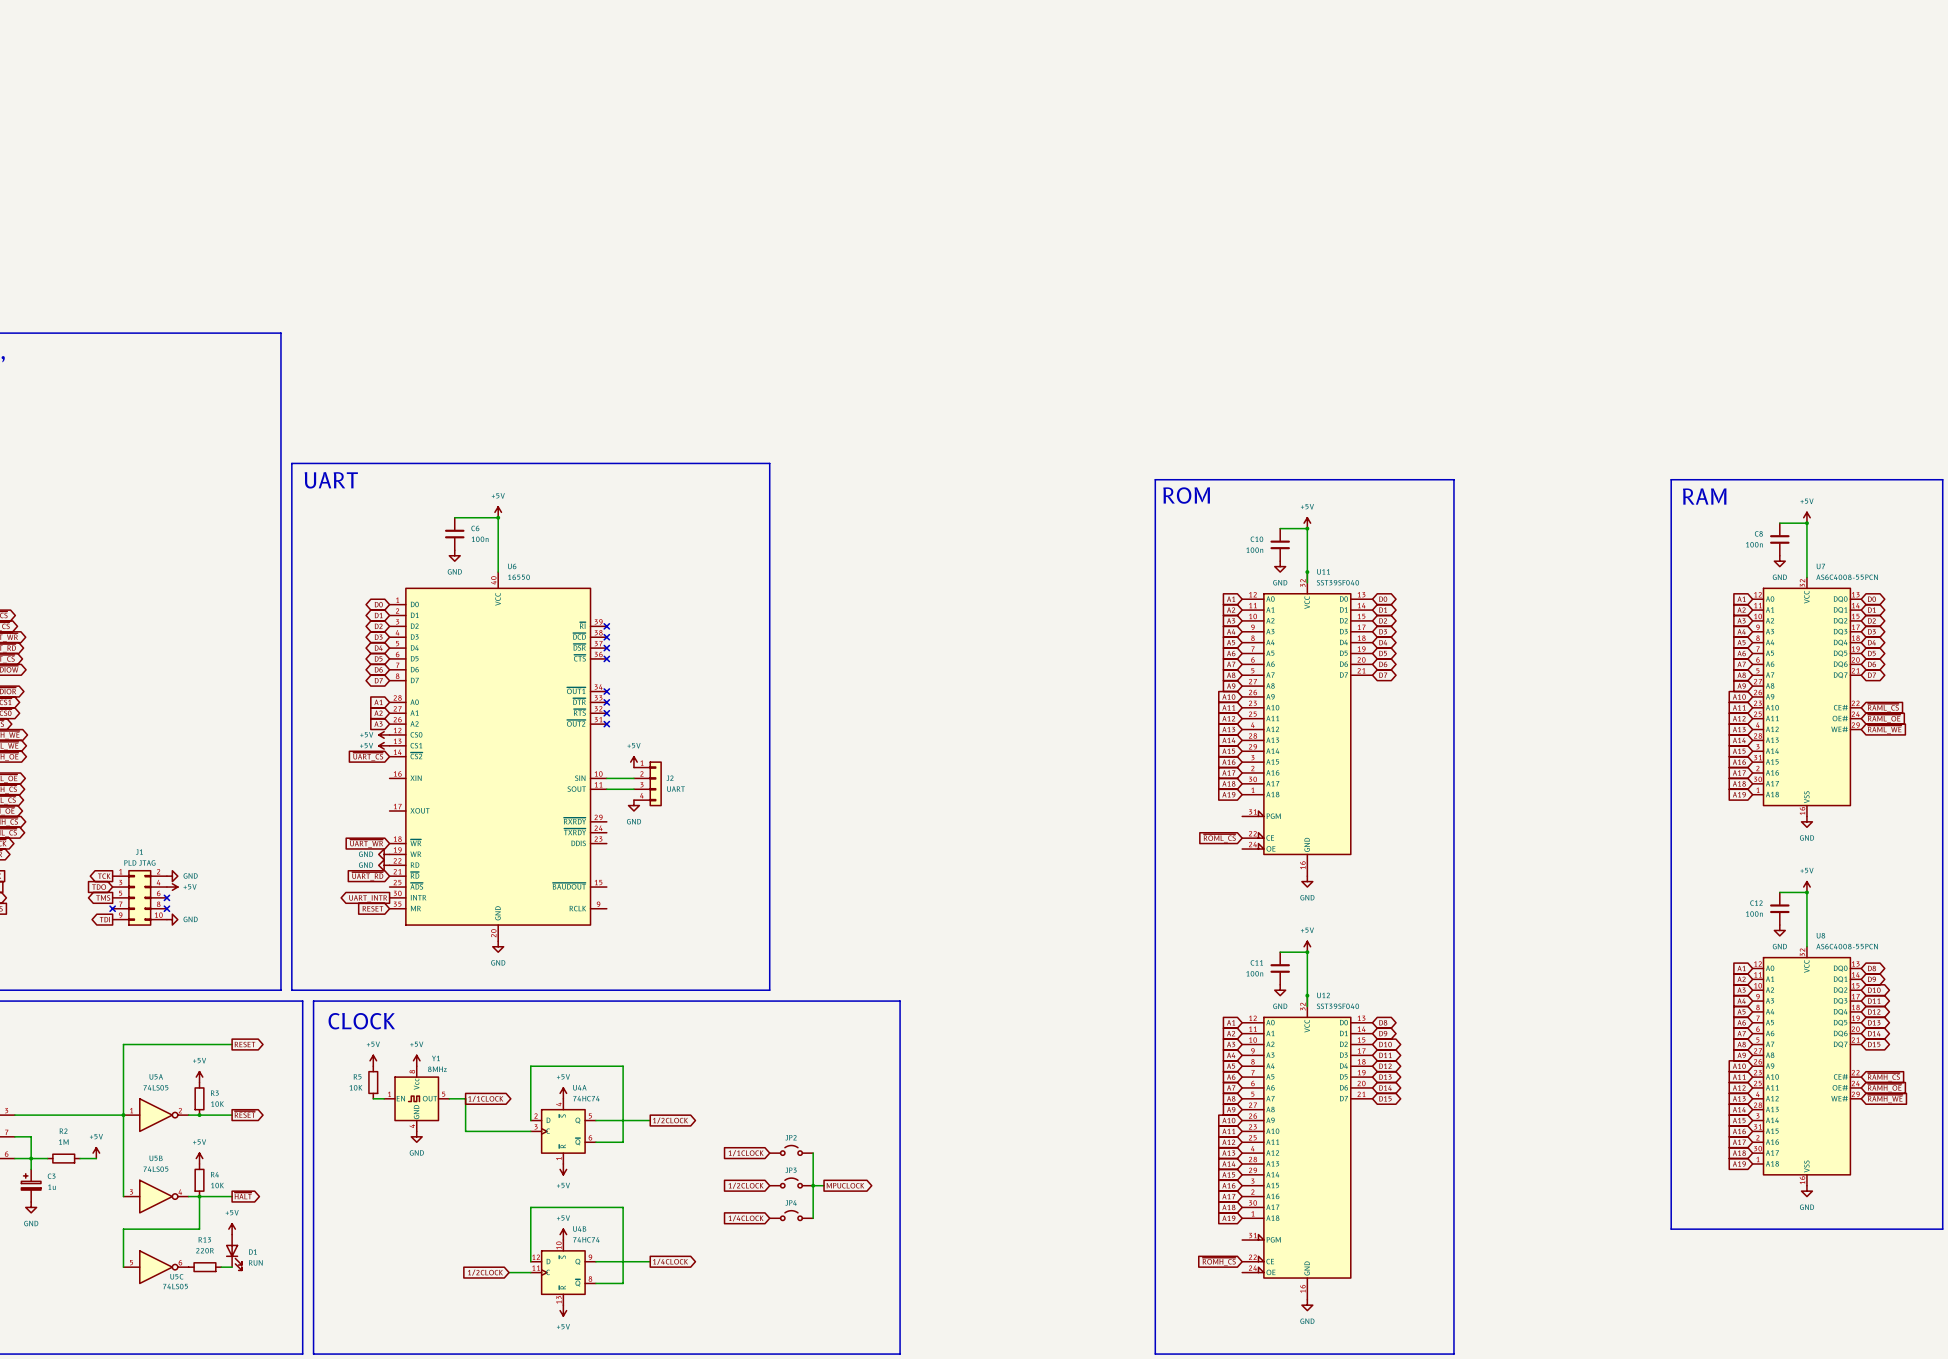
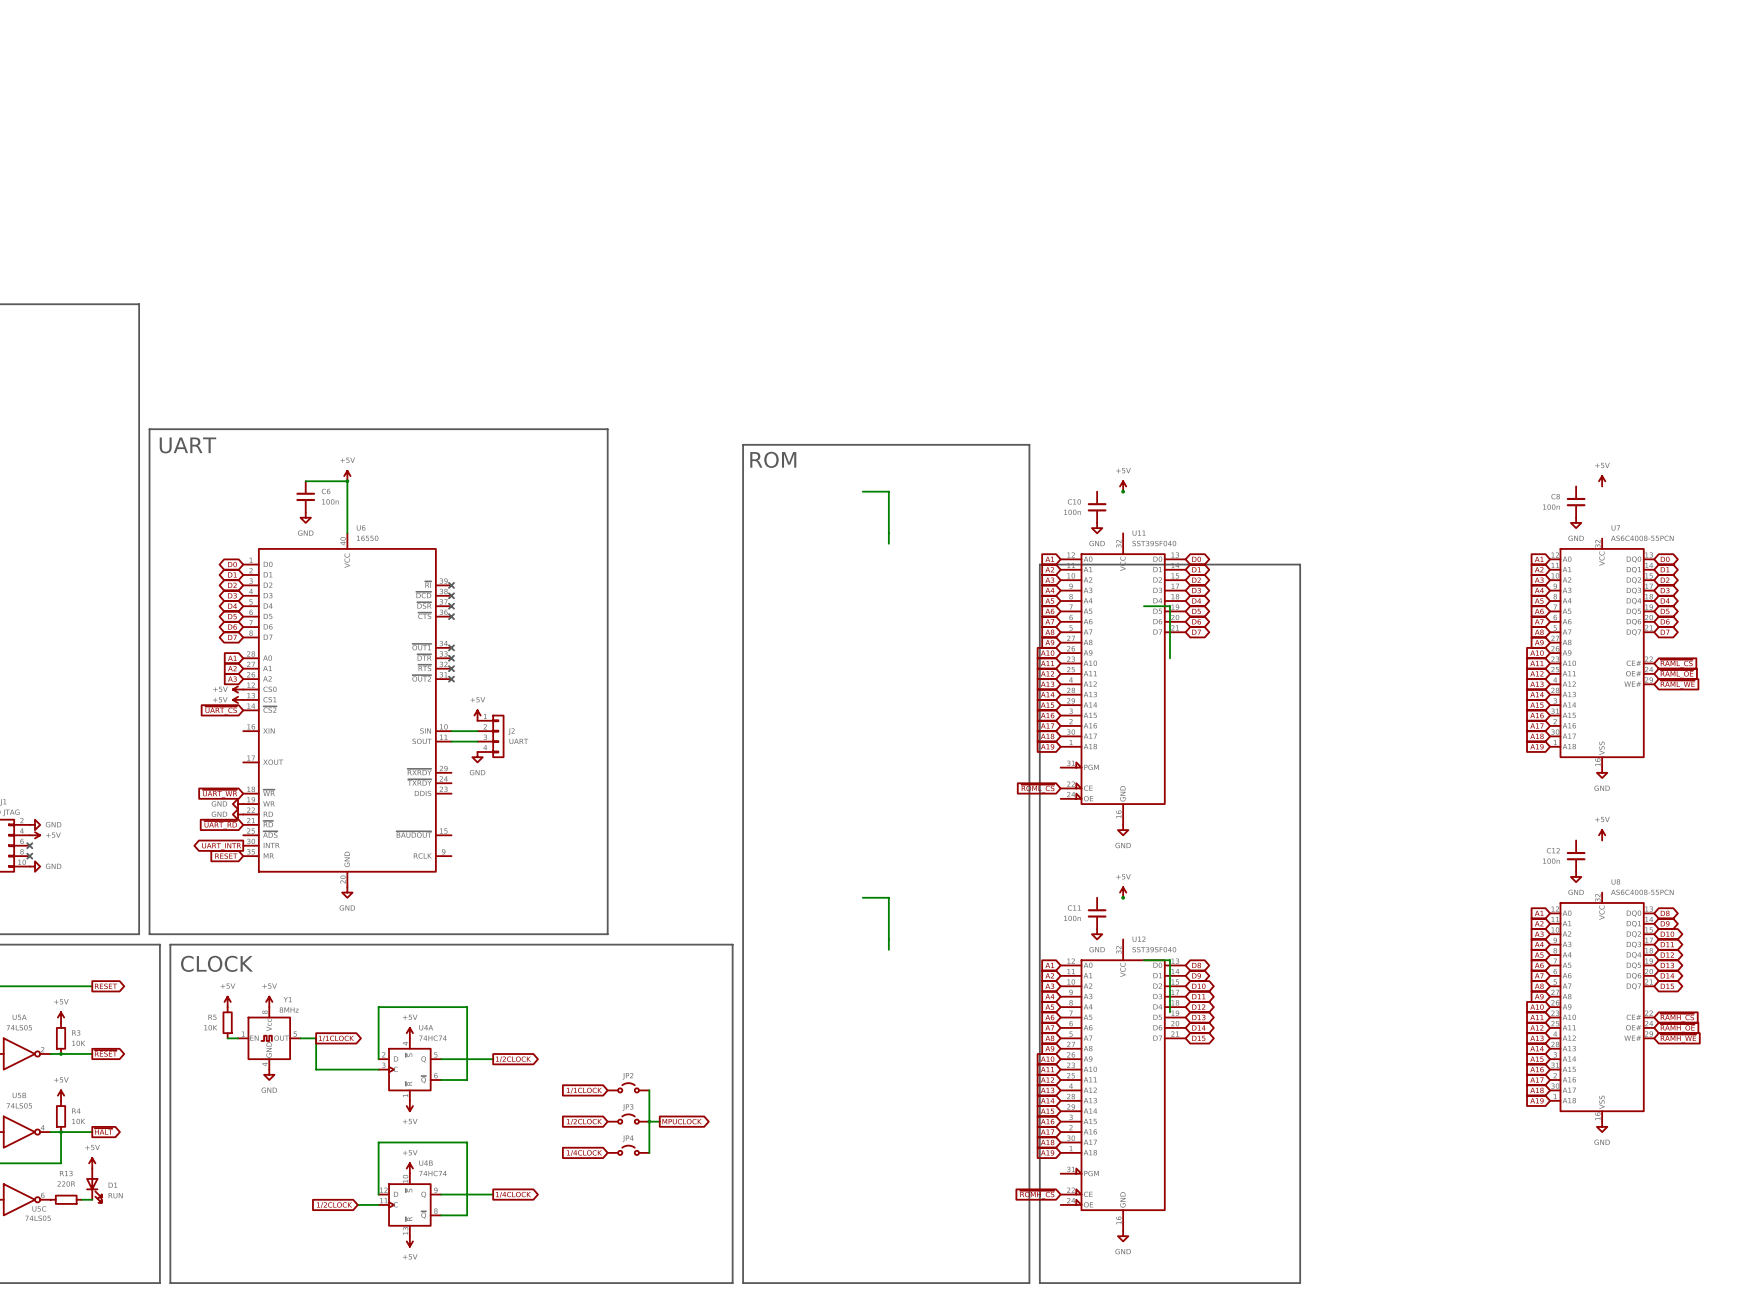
line: (1155, 479) (1155, 1354) -> (977, 444) (743, 444) (743, 1283) (977, 1283)
line: (1209, 479) (1453, 479) (1453, 1354) -> (1029, 444) (1029, 1283)
line: (1671, 479) (1942, 479) (1942, 1229) (1671, 1229) (1671, 479) -> none
text: none -> ROM (773, 459)
text: ROM (1186, 495) -> none
text: RAM (1704, 496) -> none
wire: (1779, 523) (1806, 523) (1806, 577) -> none
junction: (1806, 523) -> none
wire: none -> (862, 491) (888, 491) (888, 543)
wire: (1280, 528) (1307, 528) (1307, 582) -> none
junction: (1307, 572) -> none
wire: none -> (1143, 606) (1170, 606) (1170, 658)
wire: (1779, 892) (1806, 892) (1806, 946) -> none
junction: (1806, 892) -> none
wire: none -> (862, 897) (888, 897) (888, 949)
wire: (1280, 952) (1307, 952) (1307, 1006) -> (1143, 960) (1170, 960) (1170, 1012)
junction: (1307, 995) -> none
line: (1209, 1354) (1220, 1354) -> (1263, 1283) (1300, 1283) (1300, 564) (1039, 564) (1039, 1283)

